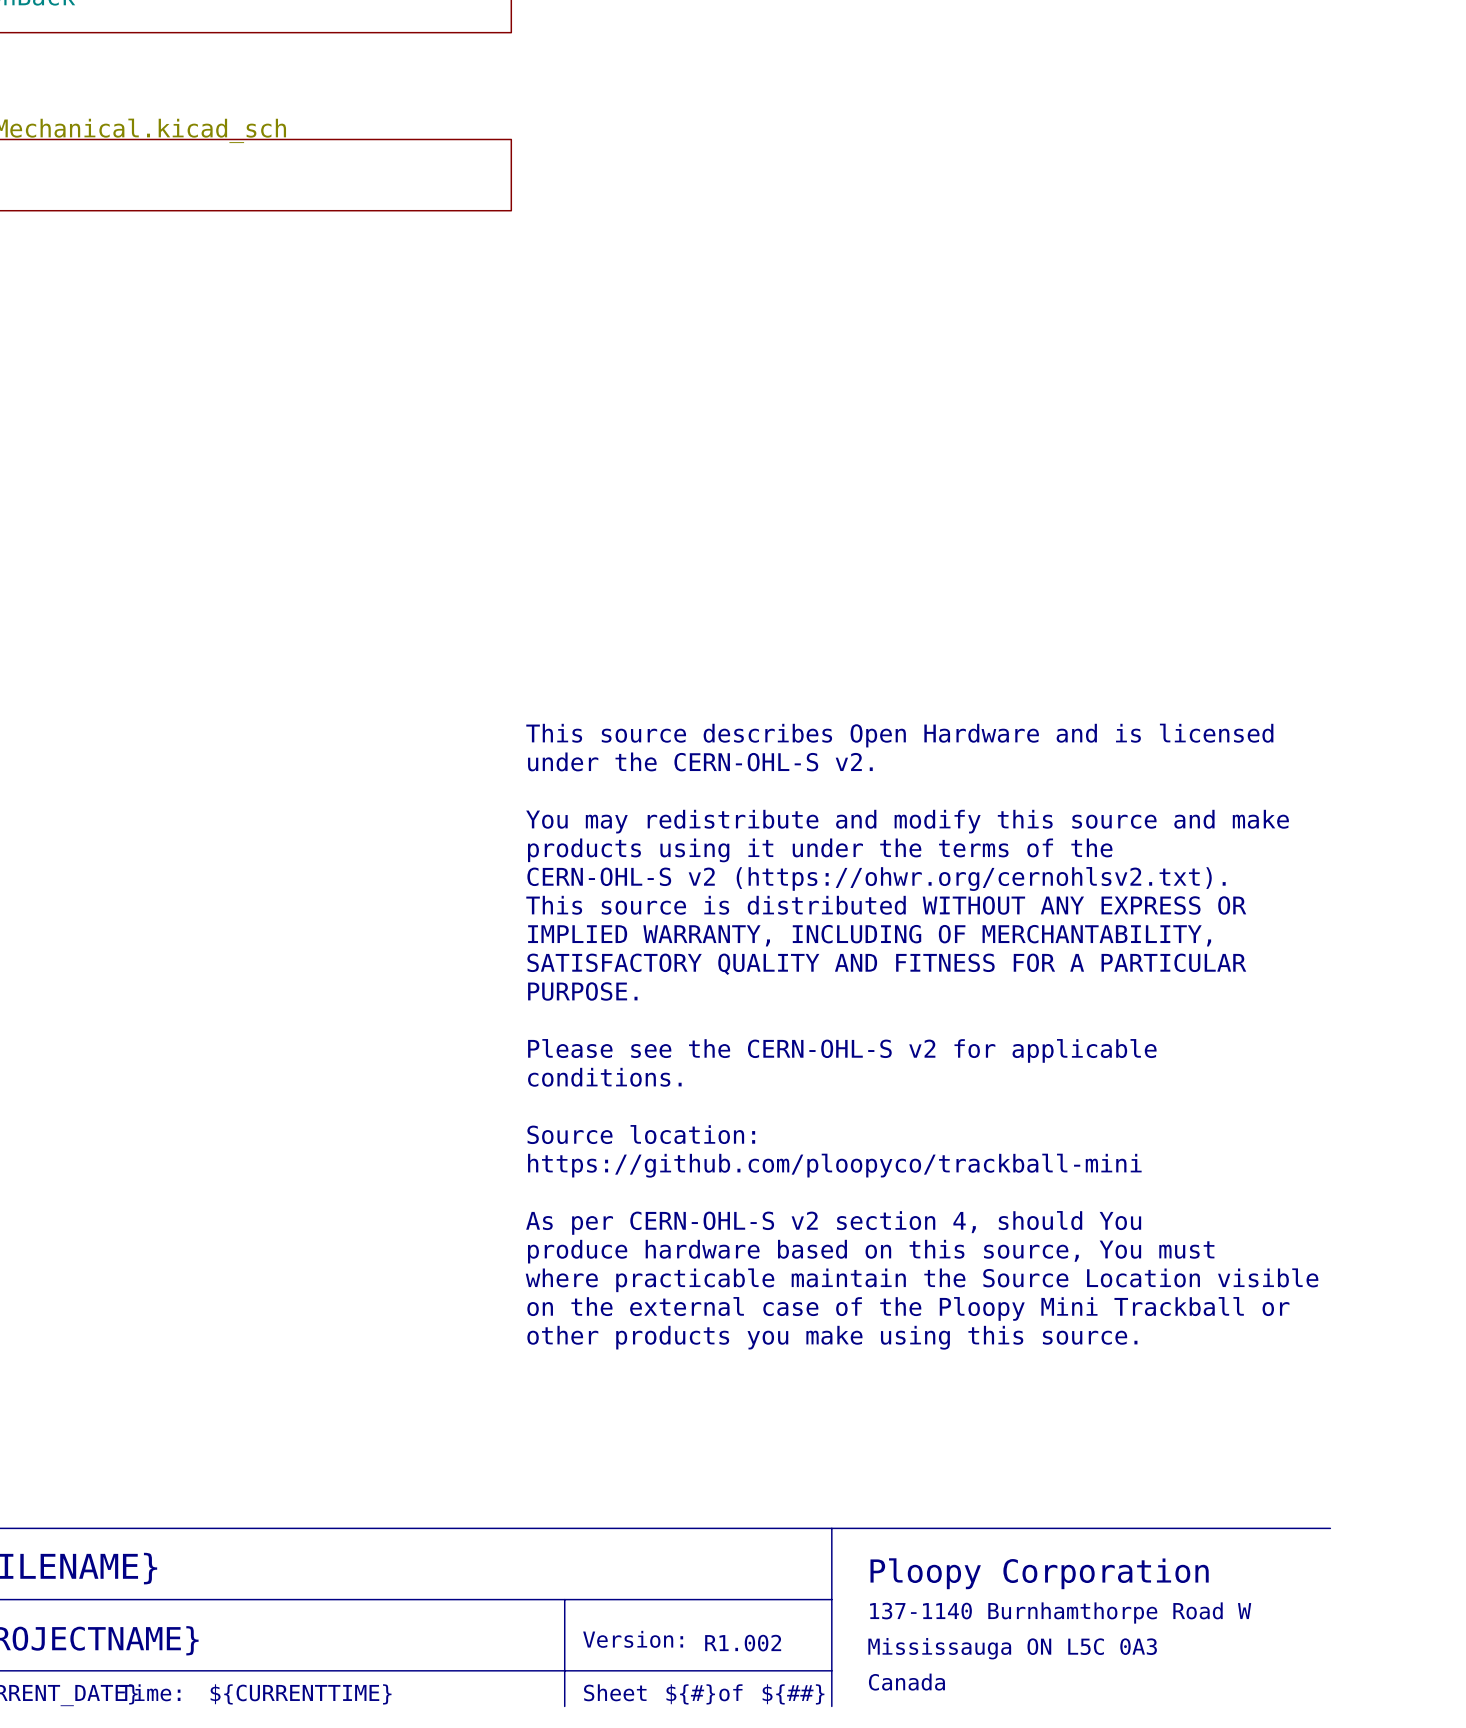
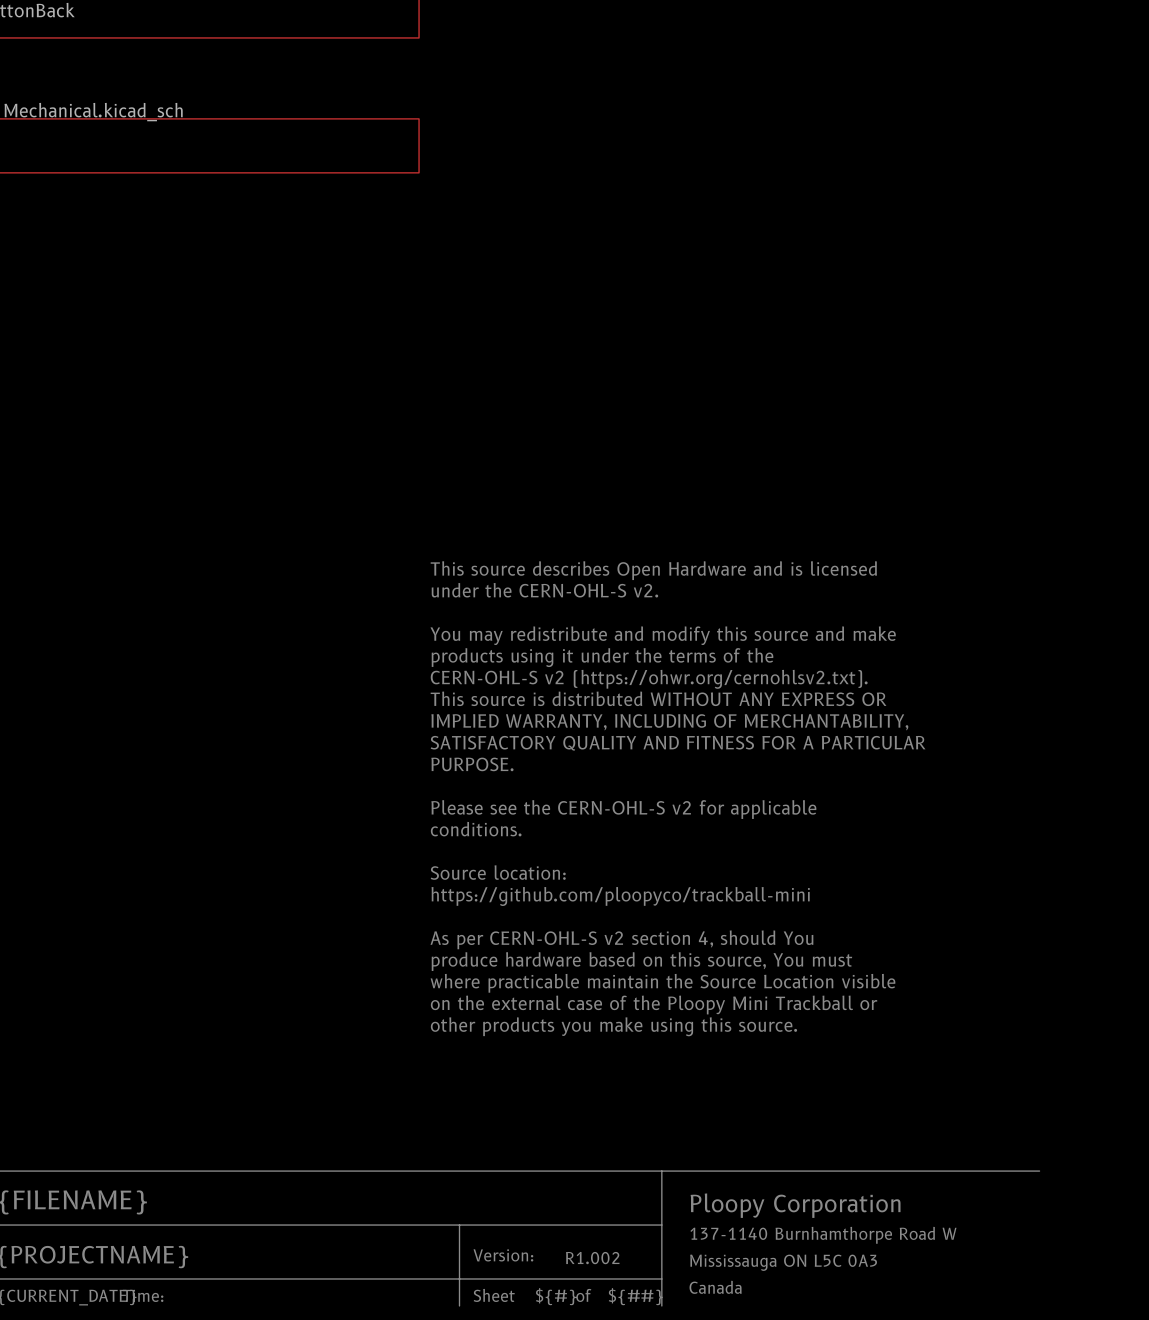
text: ${CURRENTTIME} (301, 1694) -> none

